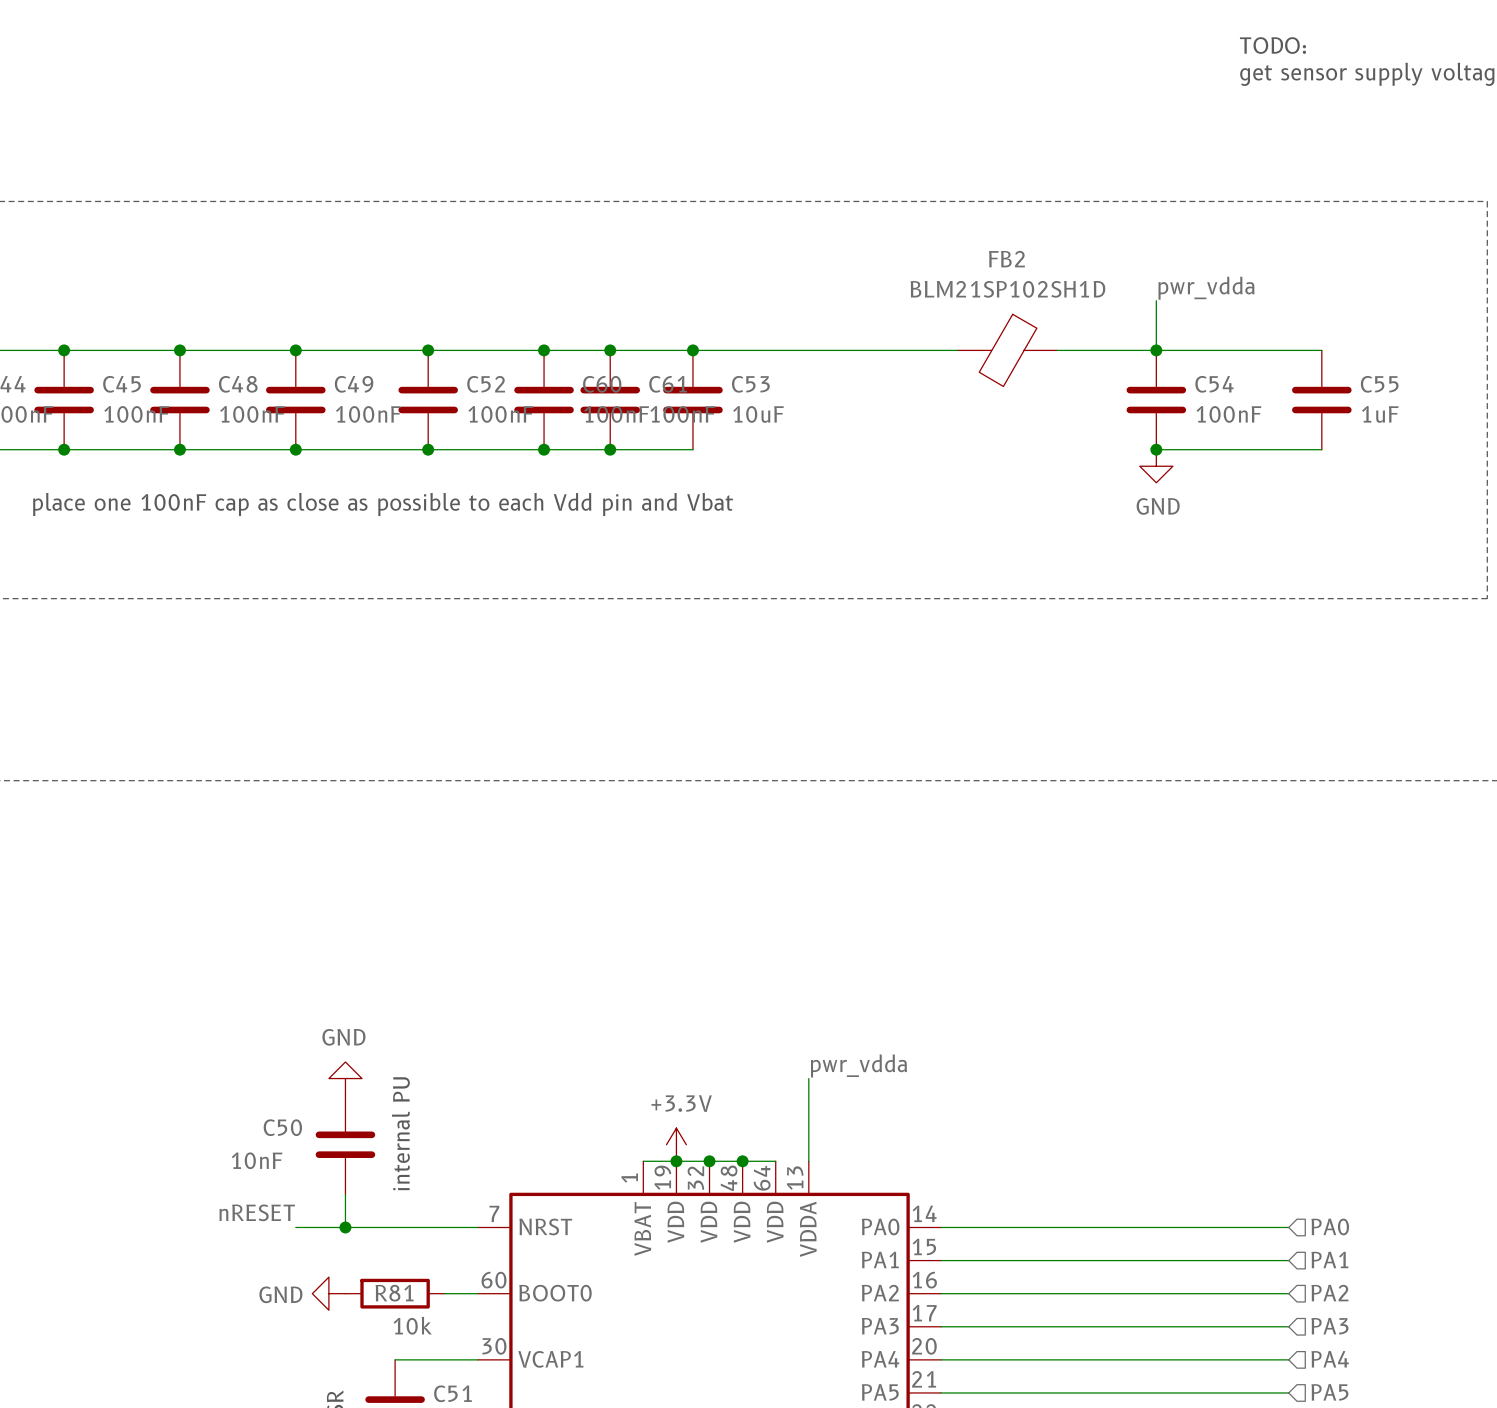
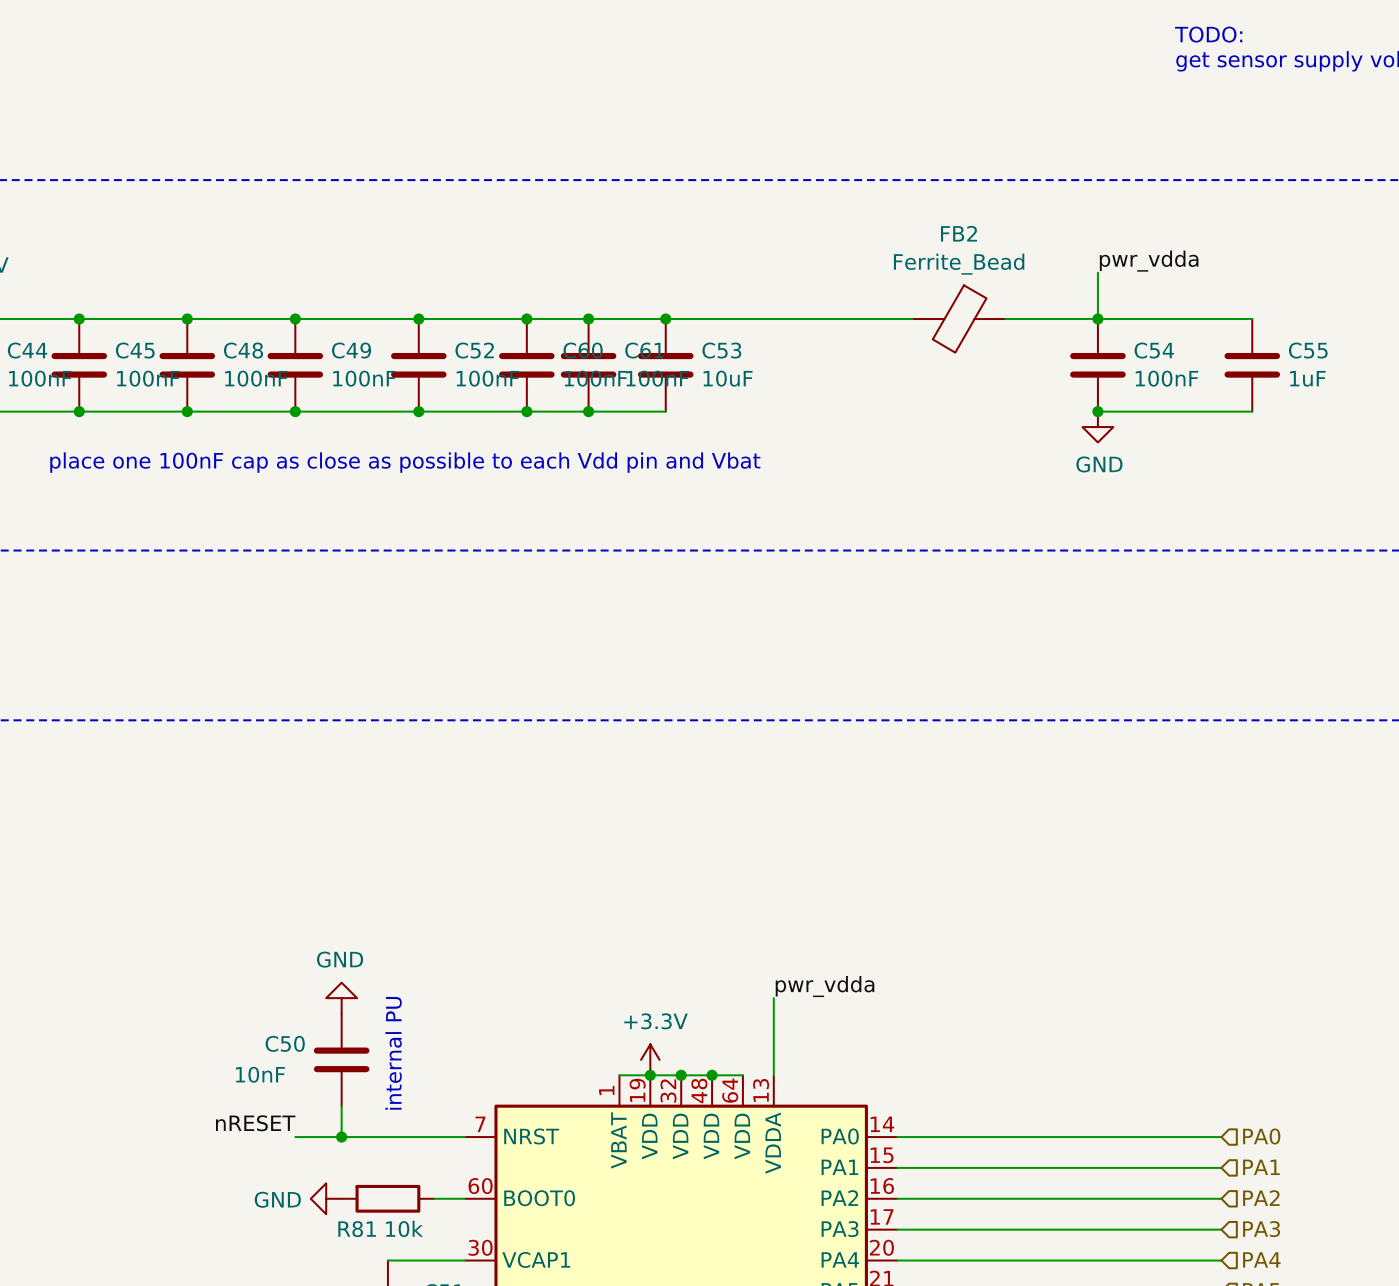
FB2 value: BLM21SP102SH1D (1007, 289) -> Ferrite_Bead (959, 264)
R81 name position: R81 (394, 1293) -> R81 (357, 1229)

